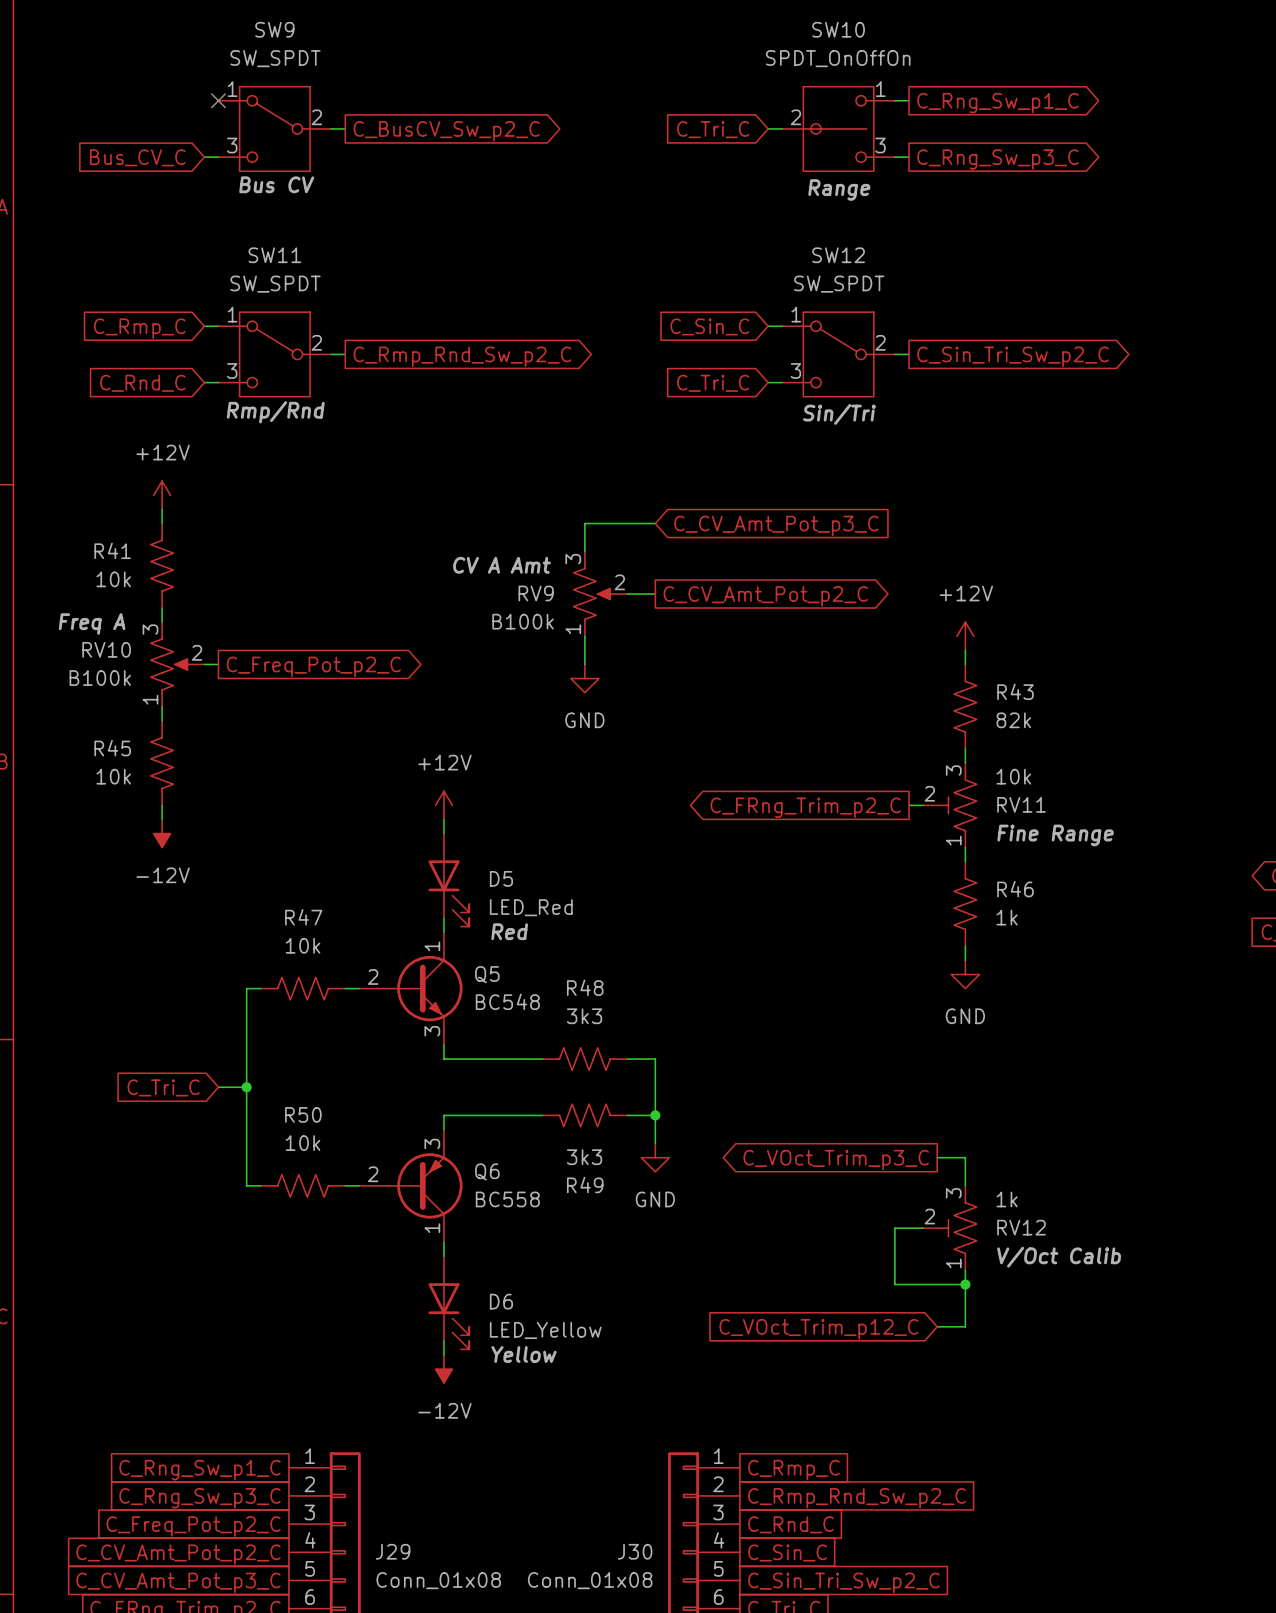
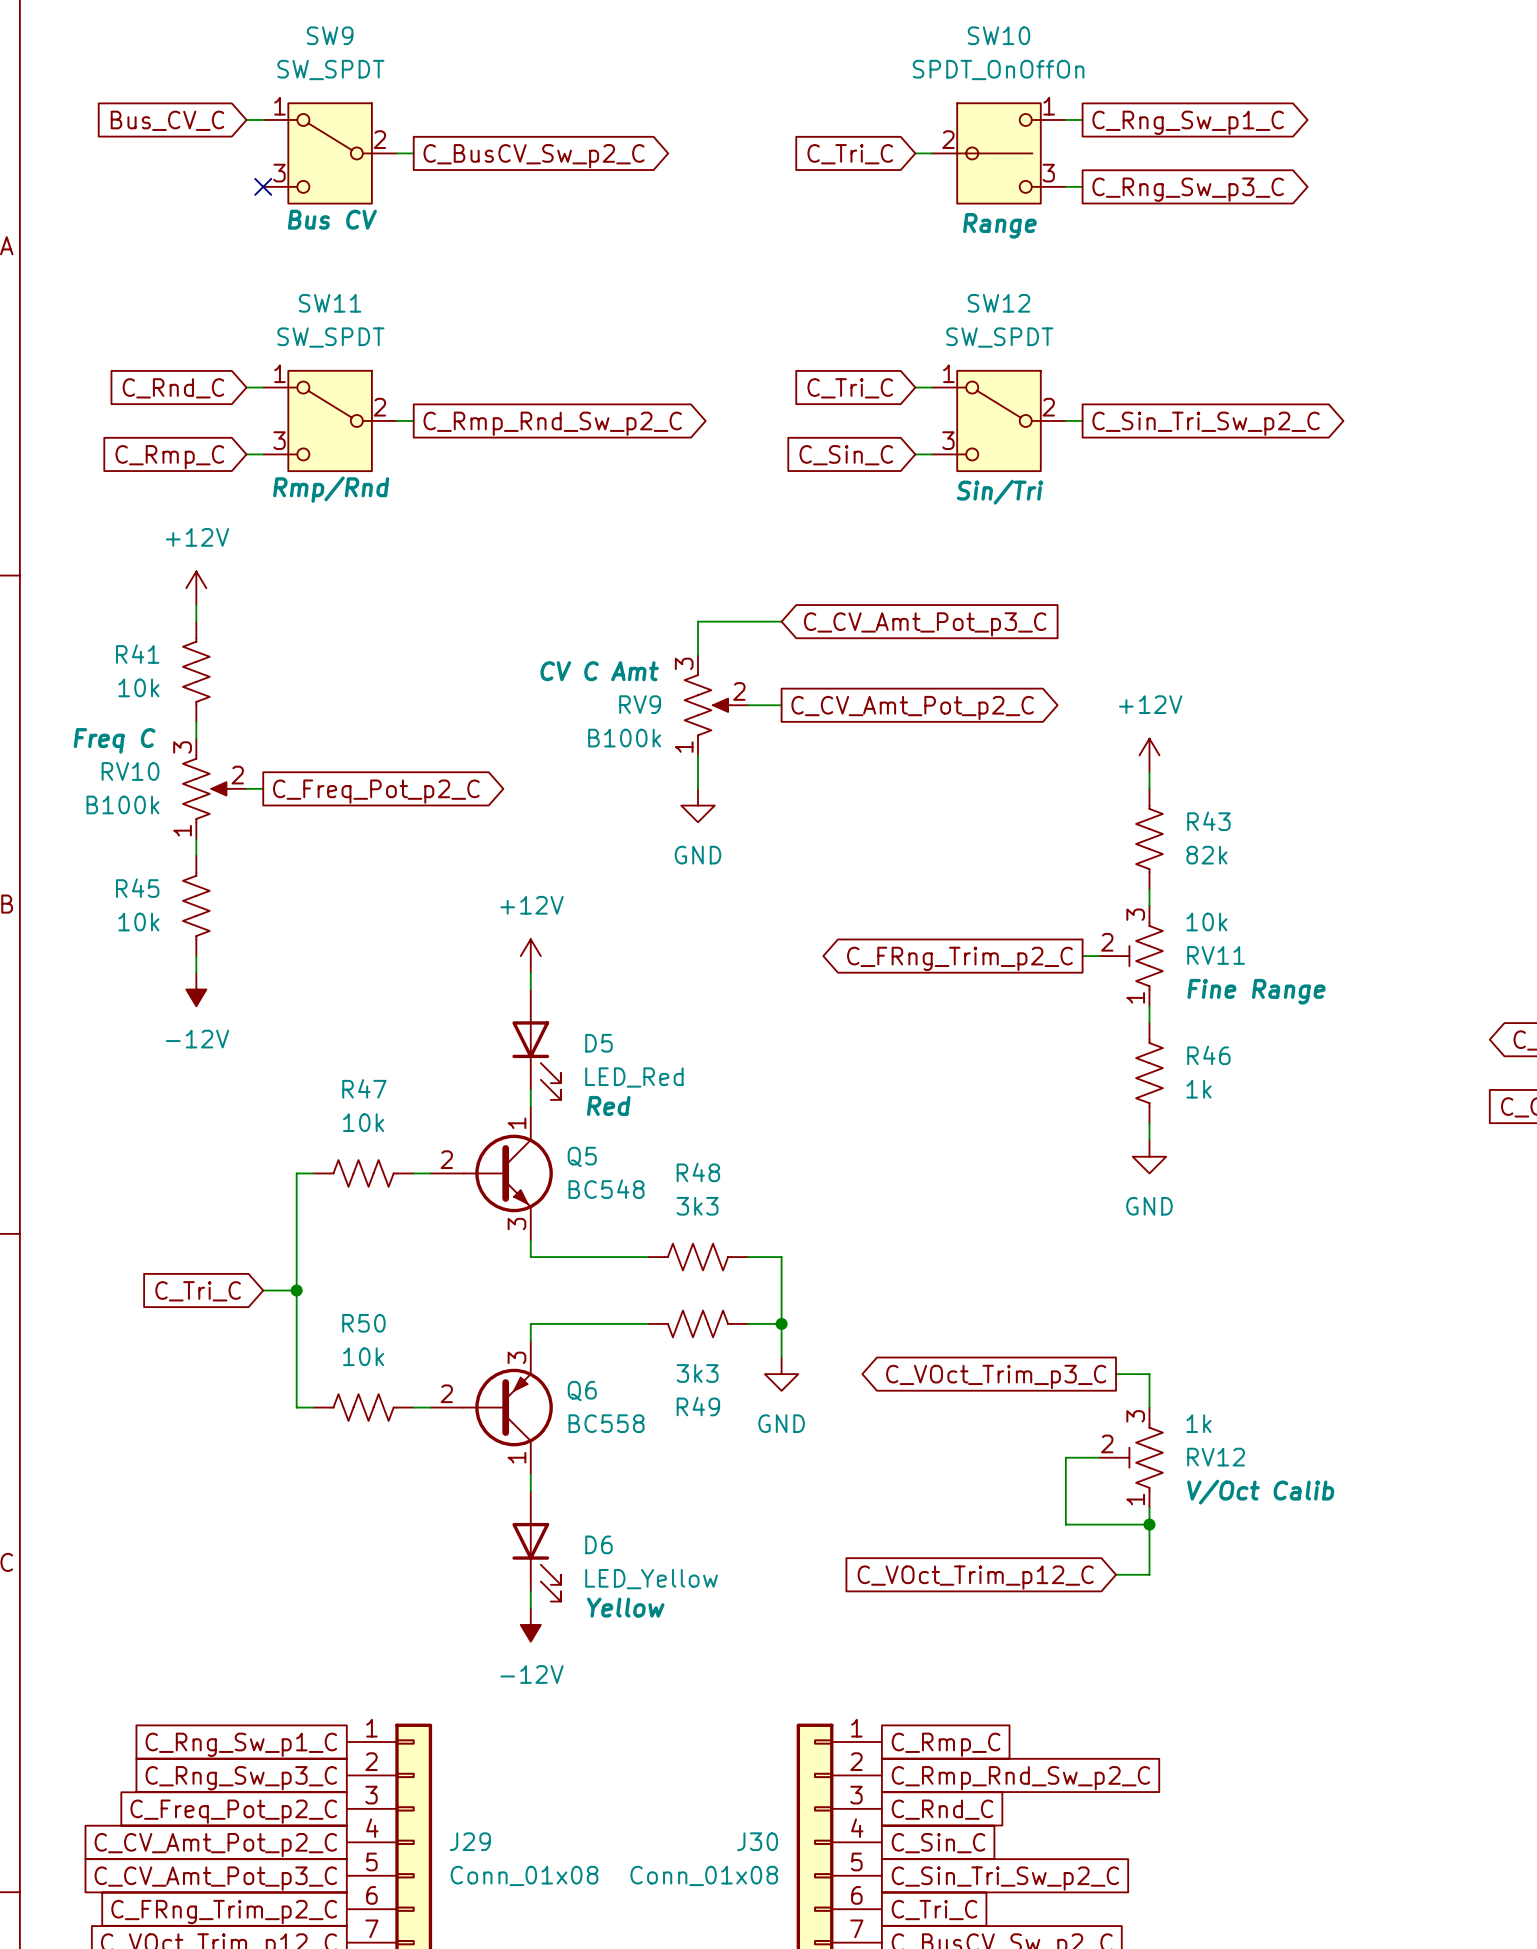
no-connect mark position: (218, 100) -> (263, 186)
global label position: Bus_CV_C (137, 157) -> Bus_CV_C (167, 120)
wire: (204, 157) (218, 157) -> (246, 119) (263, 119)
global label: C_Sin_C (709, 326) -> C_Tri_C (850, 388)
global label: C_Rmp_C (139, 328) -> C_Rnd_C (173, 388)
global label: C_Rnd_C (142, 383) -> C_Rmp_C (169, 457)
global label: C_Tri_C (713, 383) -> C_Sin_C (846, 455)
RV9 text: CV A Amt (501, 565) -> CV C Amt (599, 671)
RV10 text: Freq A (92, 624) -> Freq C (114, 740)

